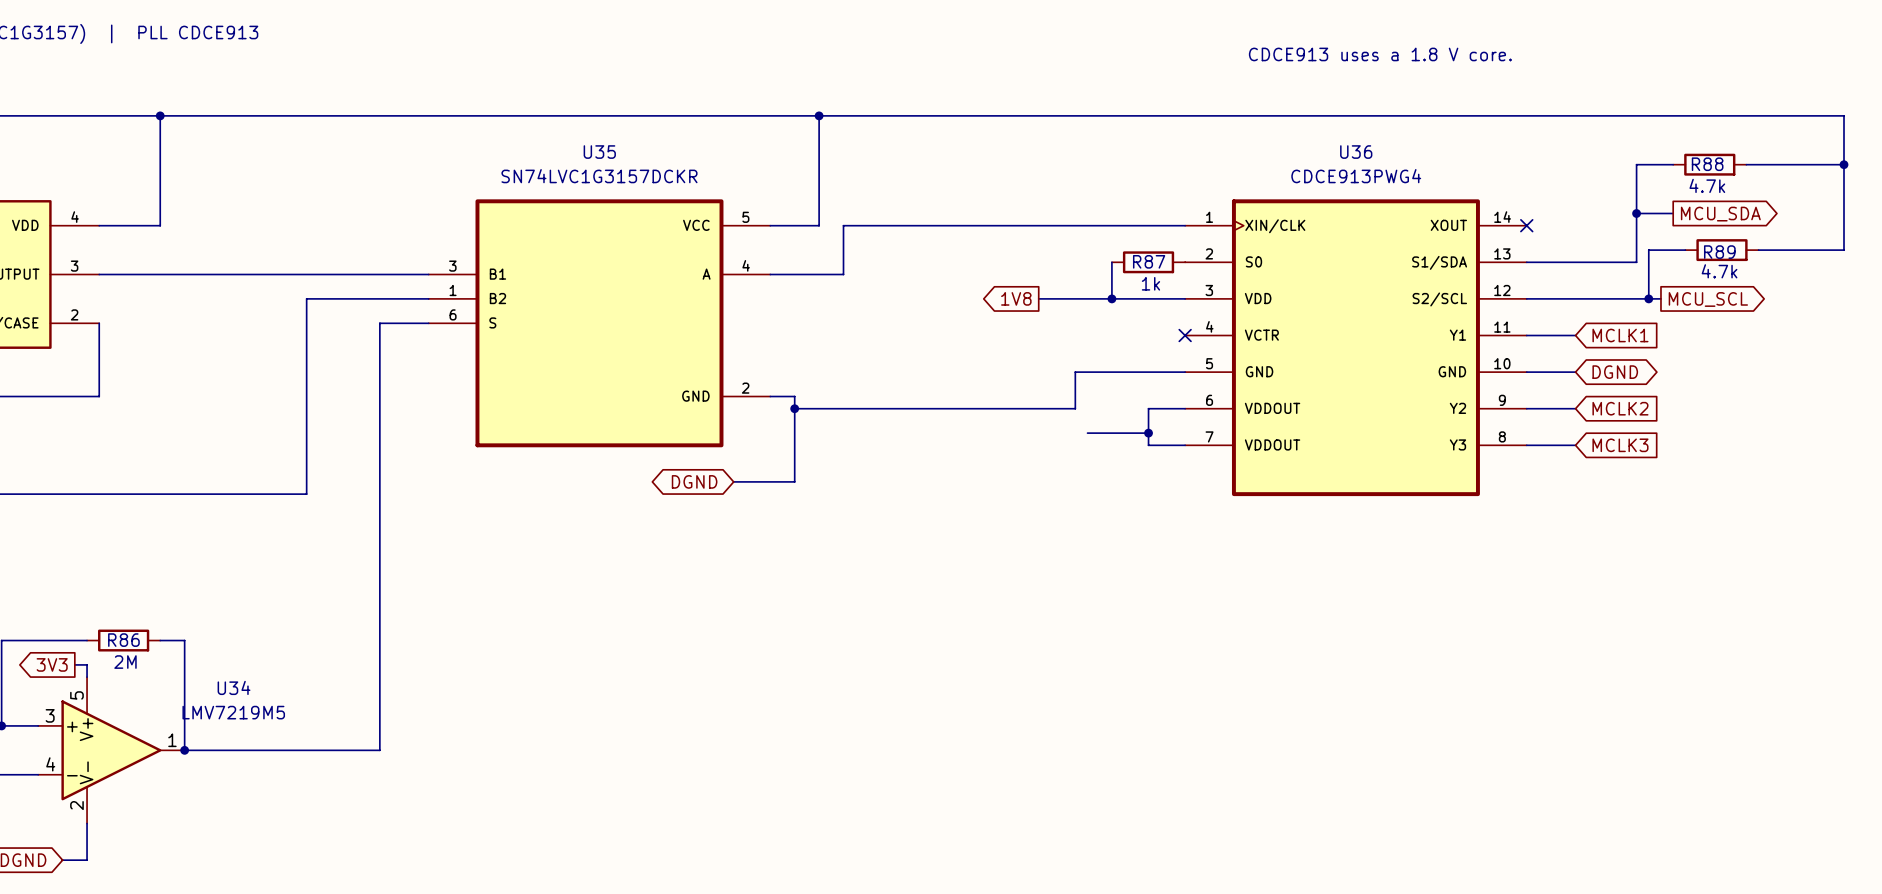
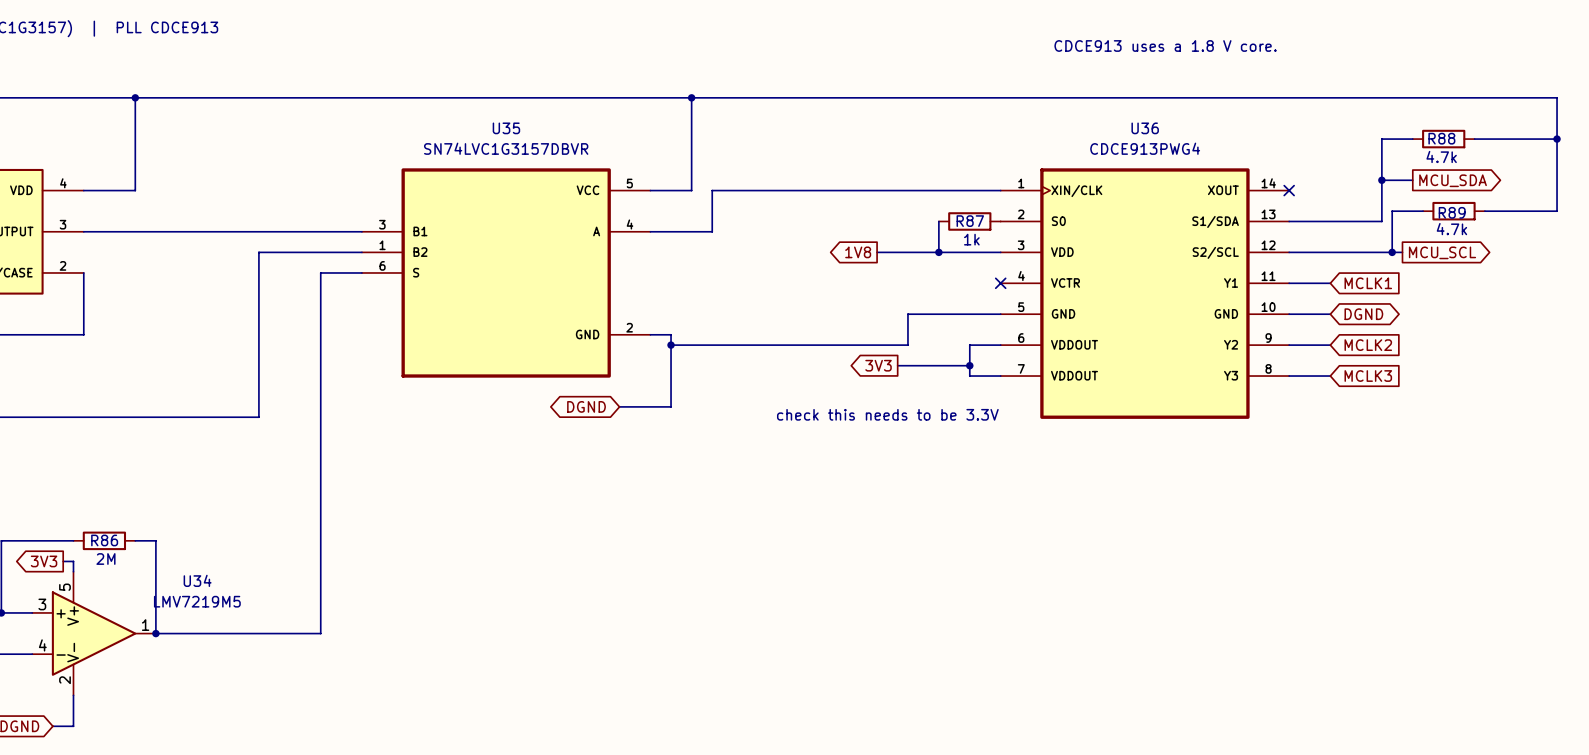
U35 value: SN74LVC1G3157DCKR (599, 176) -> SN74LVC1G3157DBVR (506, 148)
global label: none -> 3V3 (878, 365)
wire: none -> (897, 365) (918, 365)
text: none -> check this needs to be 3.3V (887, 414)

